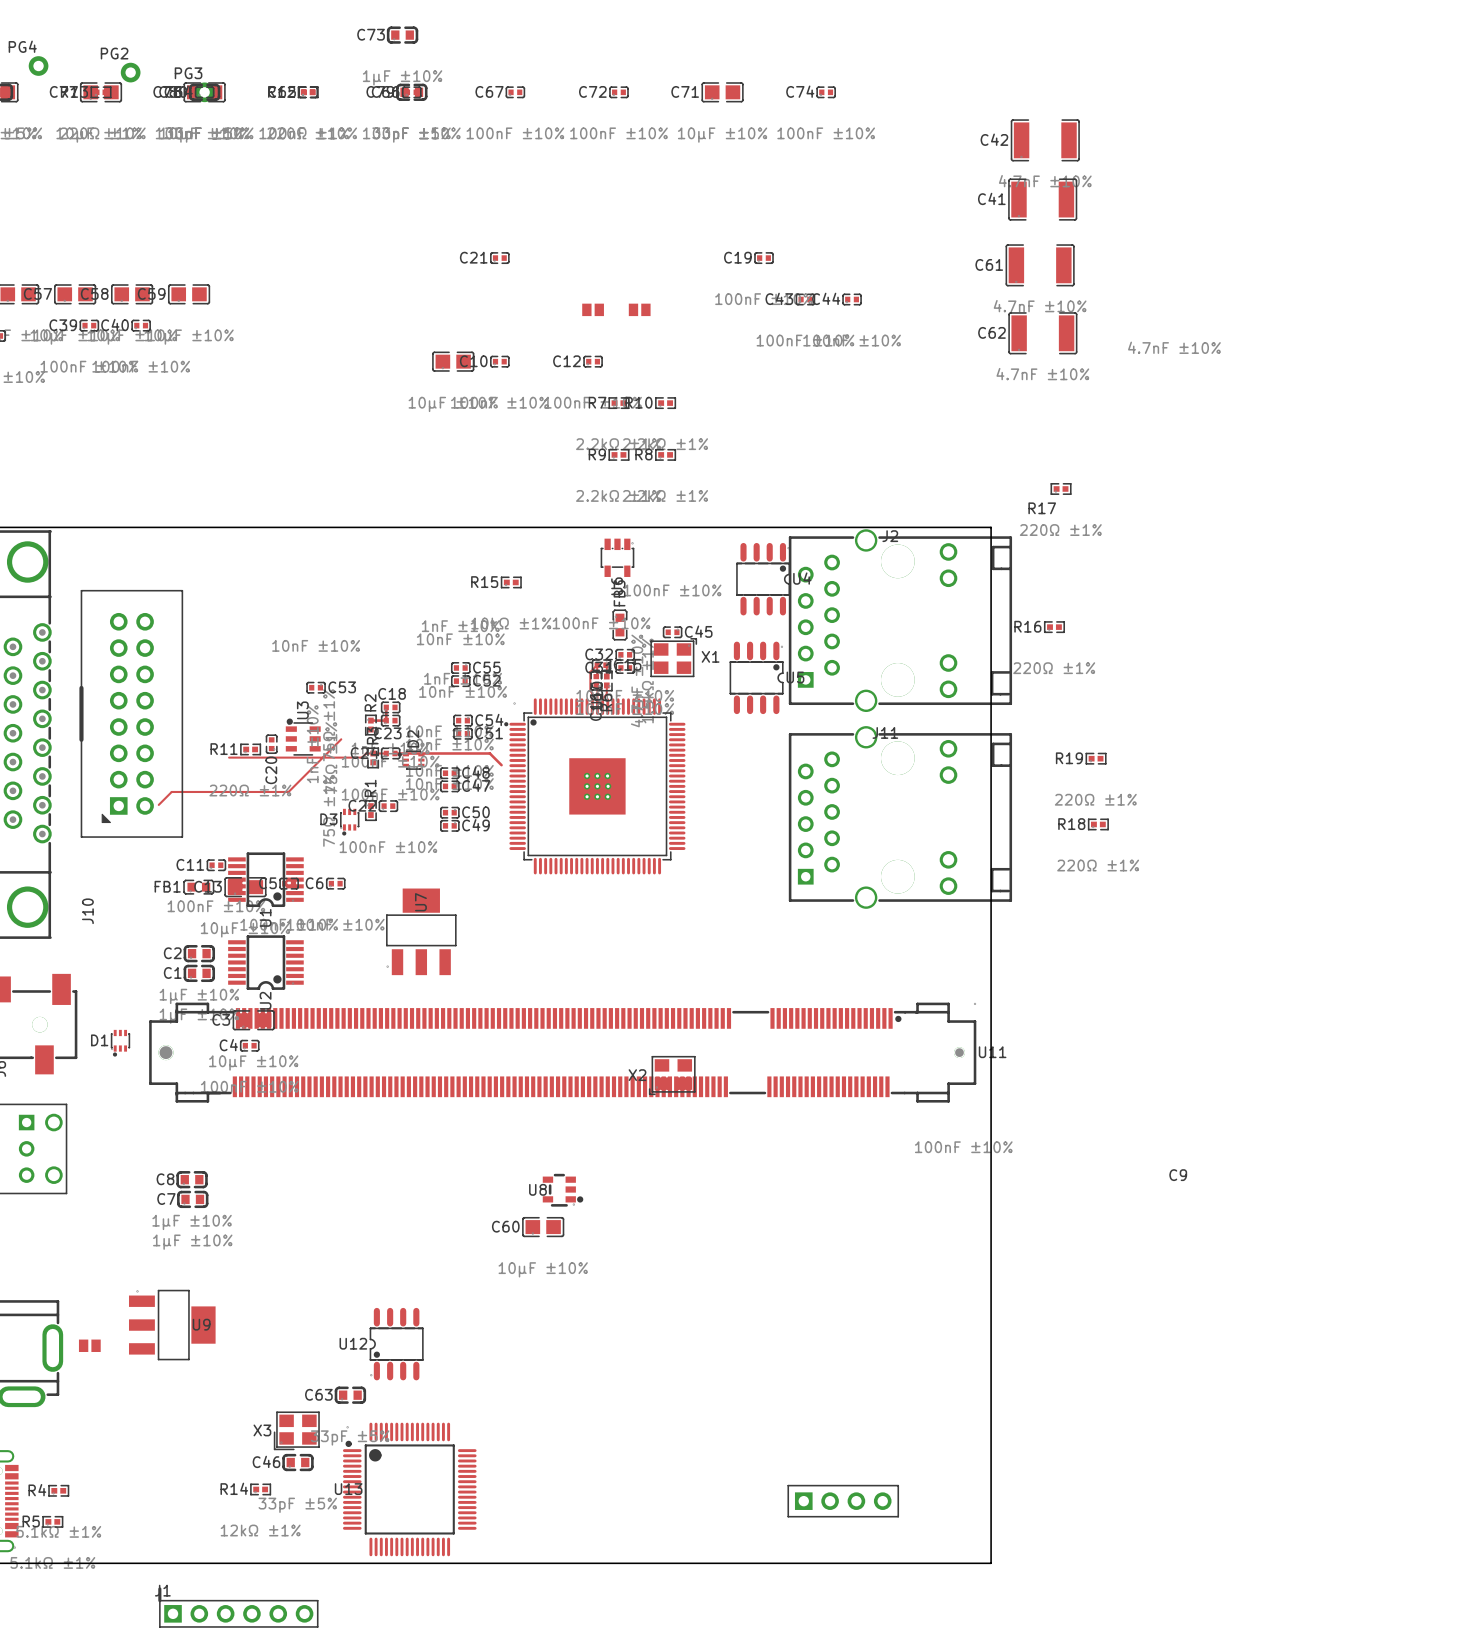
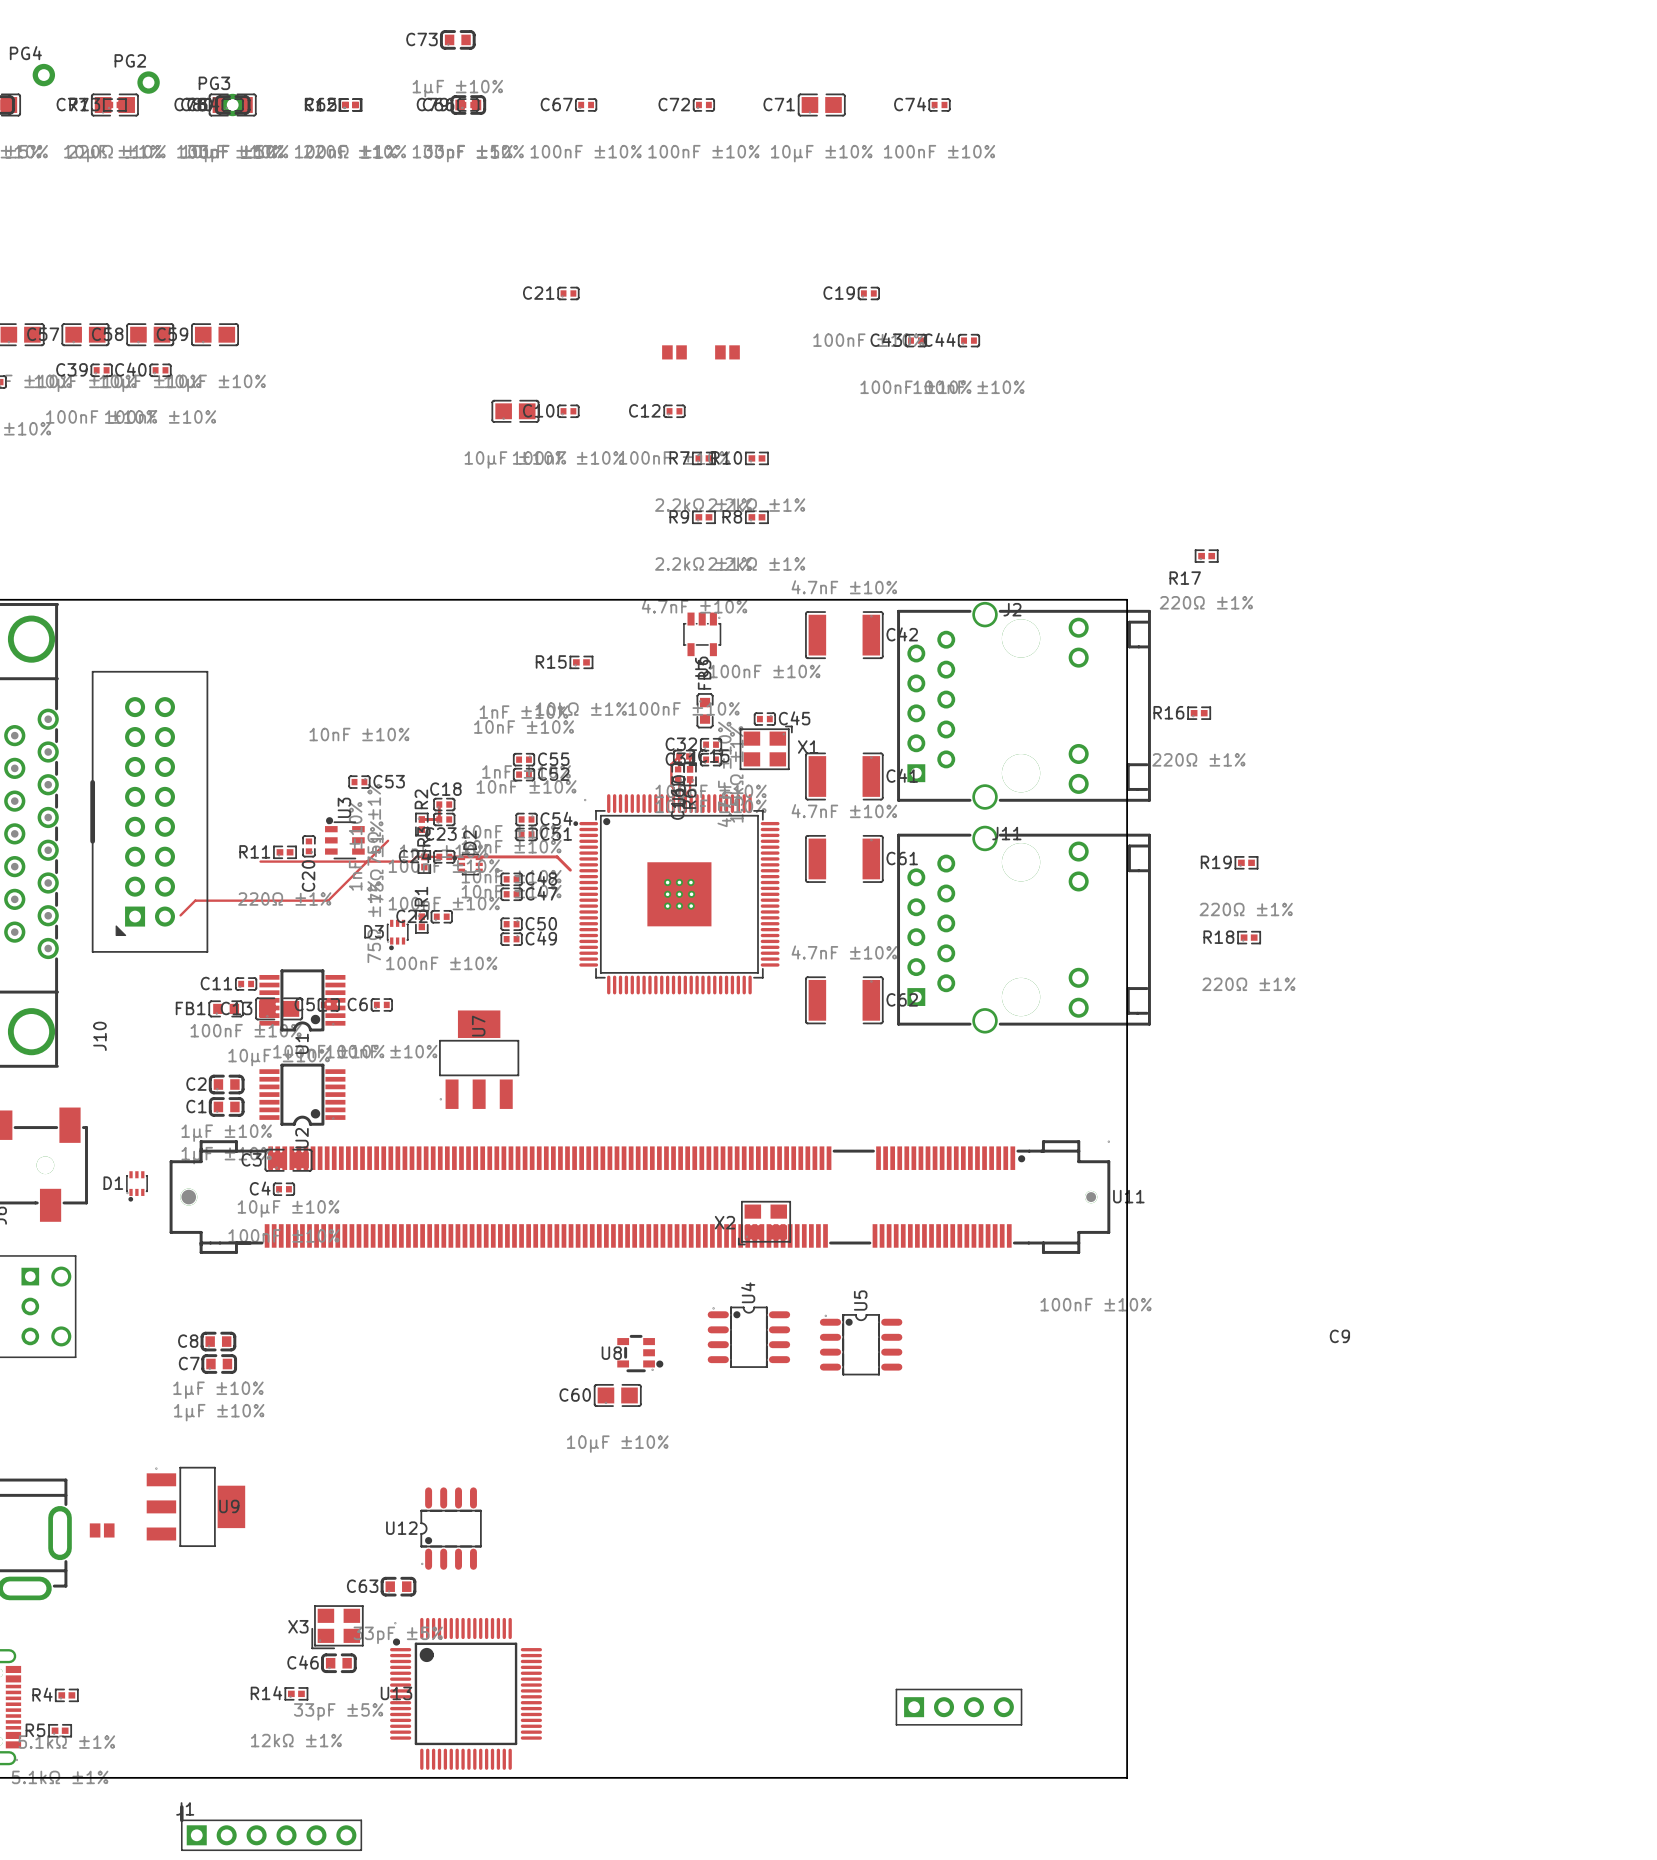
C42 rotation: 0° (1045, 140) -> 180° (844, 635)
C42 position: (1045, 140) -> (844, 635)
C41 rotation: 0° (1042, 199) -> 180° (844, 776)
C41 position: (1042, 199) -> (844, 776)
C61 rotation: 0° (1040, 265) -> 180° (844, 858)
C61 position: (1040, 265) -> (844, 858)
C62 rotation: 0° (1042, 333) -> 180° (844, 1000)
C62 position: (1042, 333) -> (844, 1000)
U4 rotation: 0° (763, 579) -> 90° counterclockwise (748, 1337)
U4 position: (763, 579) -> (748, 1337)
U5 rotation: 0° (756, 677) -> 90° counterclockwise (861, 1344)
U5 position: (756, 677) -> (861, 1344)

